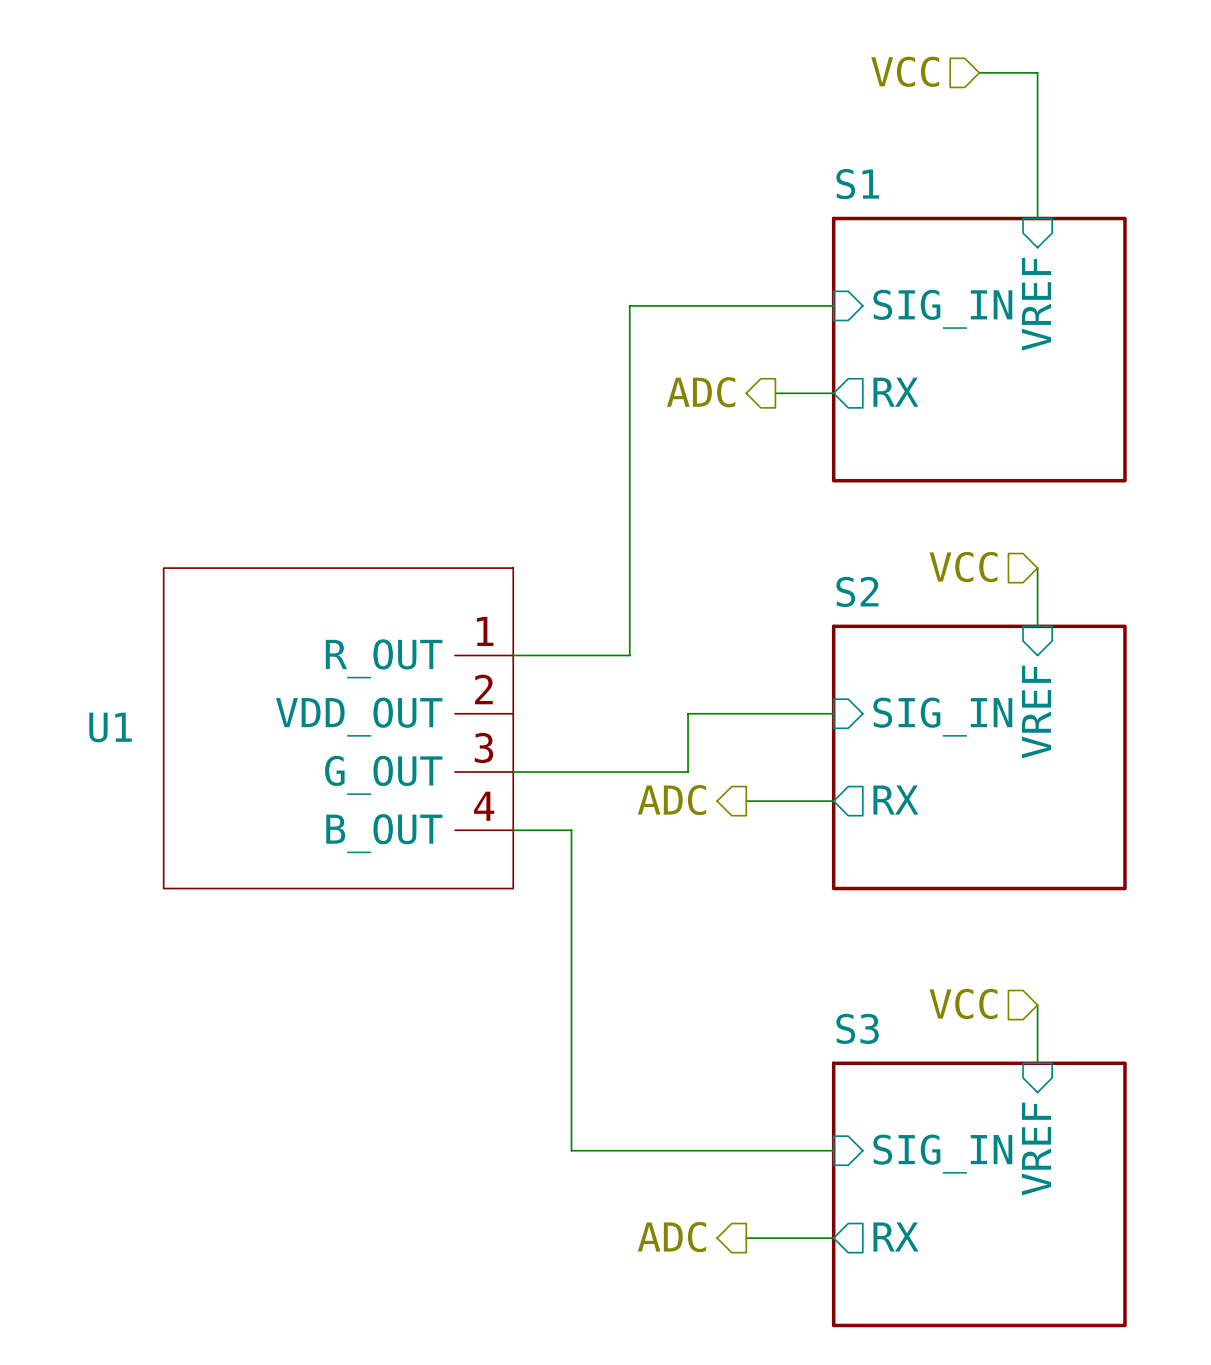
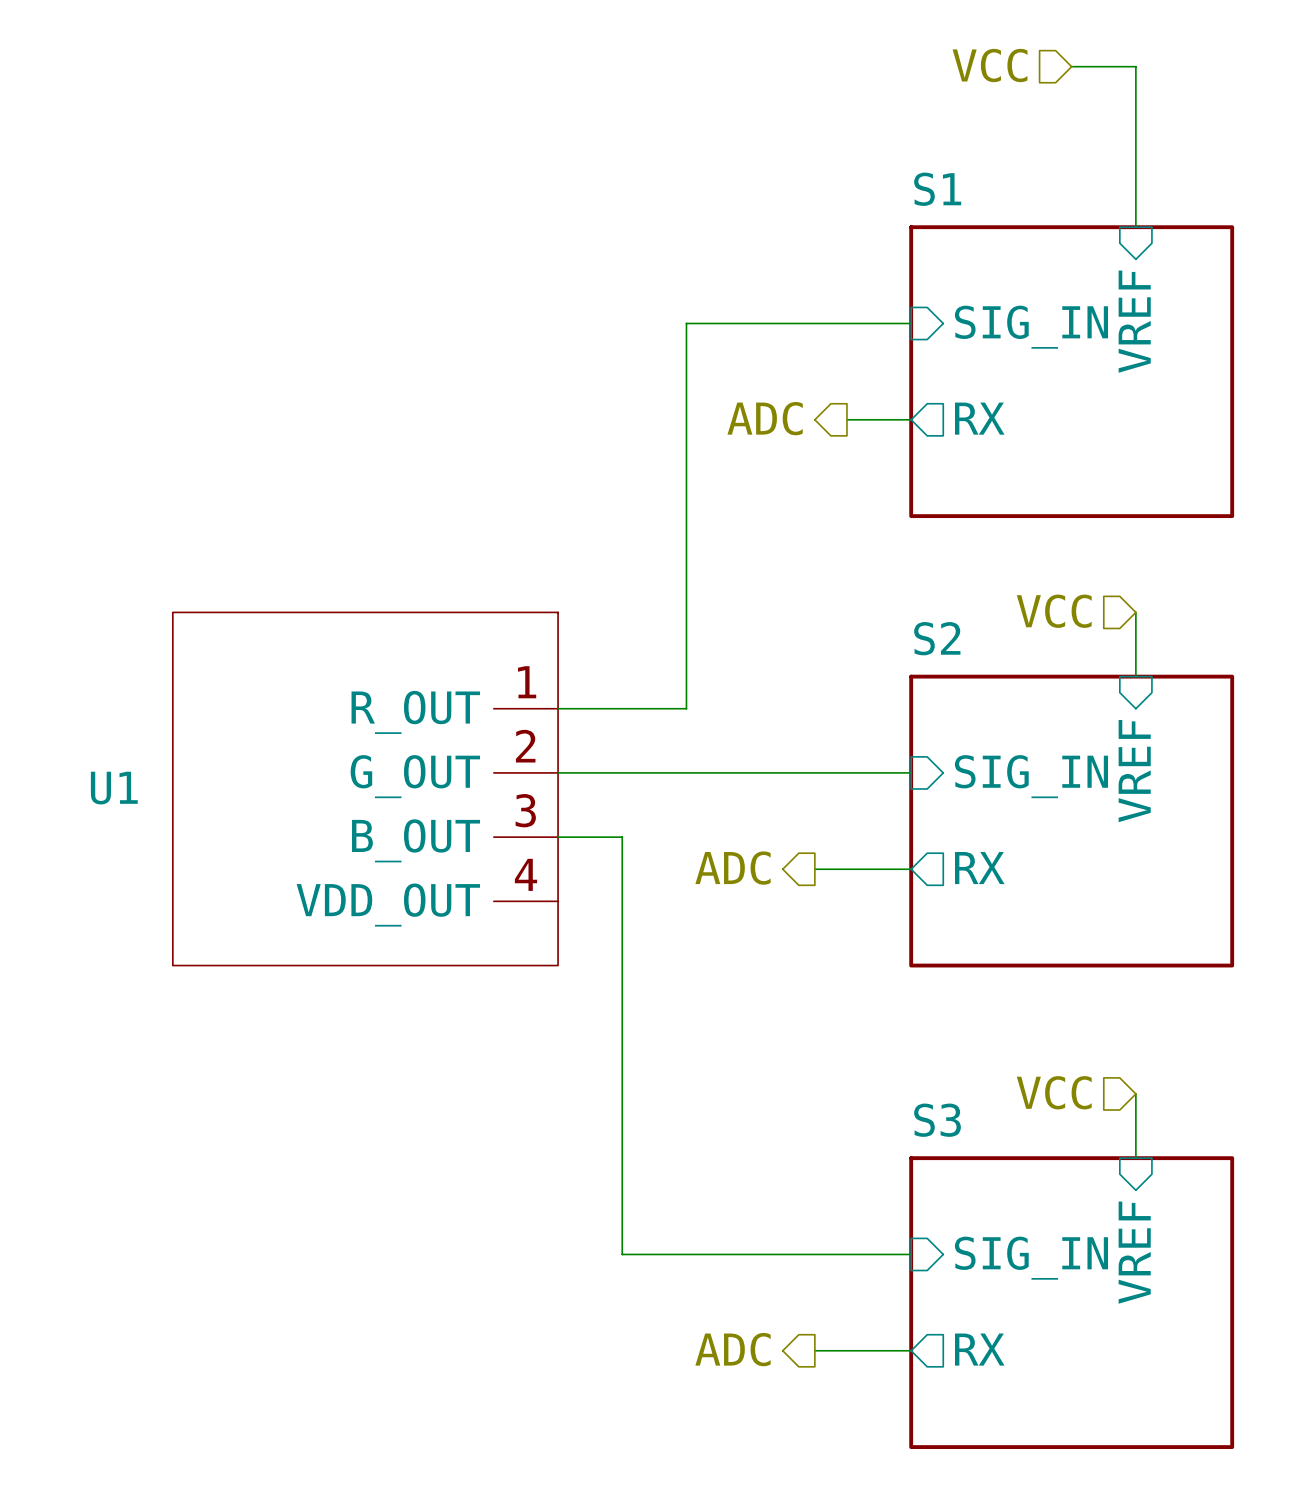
wire: (688, 713) (688, 772) (571, 772) -> (750, 772) (558, 772)
U1 pin name: VDD_OUT (359, 717) -> G_OUT (415, 776)
U1 pin name: G_OUT (383, 775) -> B_OUT (416, 840)
wire: (513, 830) (571, 830) -> (622, 837) (622, 901)
U1 pin name: B_OUT (384, 833) -> VDD_OUT (388, 905)

